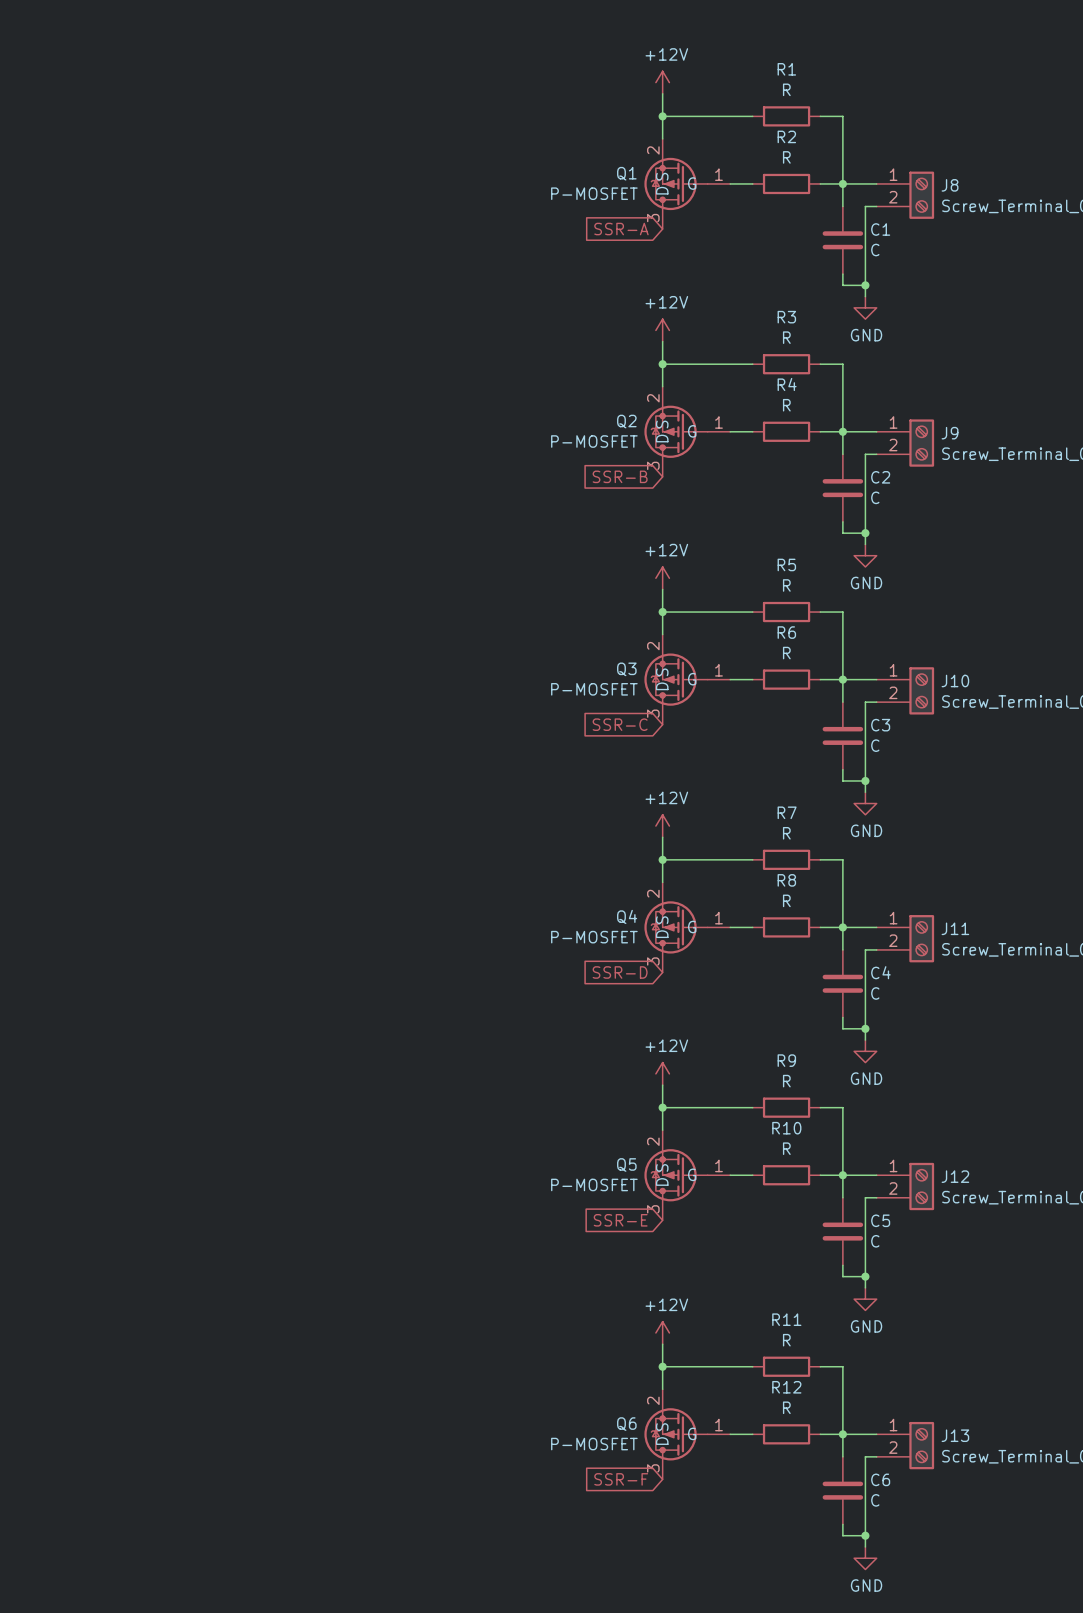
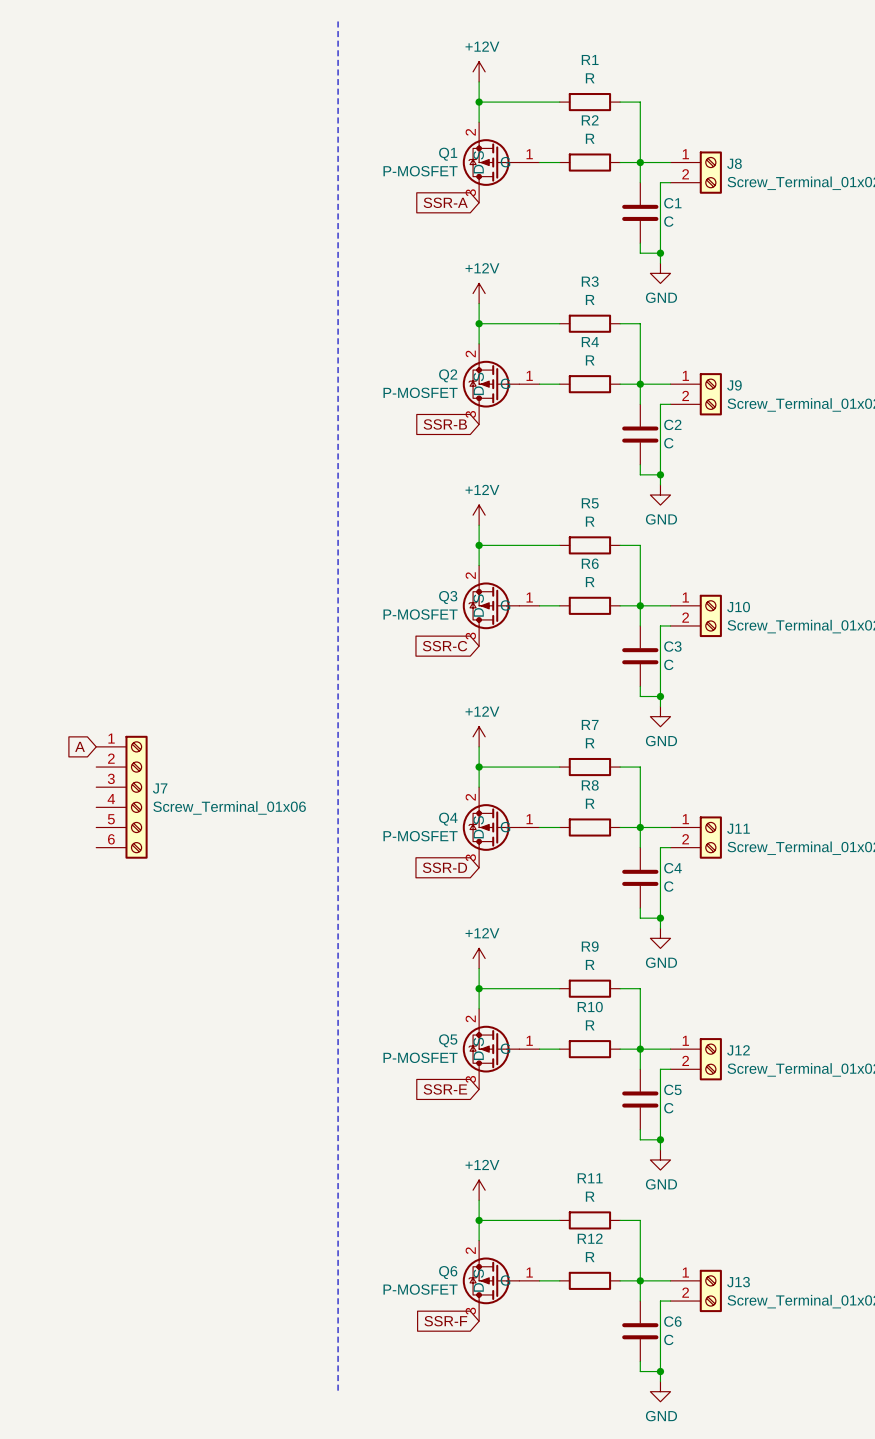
line: none -> (338, 21) (338, 1391)
global label: none -> A (80, 746)
J7: none -> Screw_Terminal_01x06 (121, 797)

